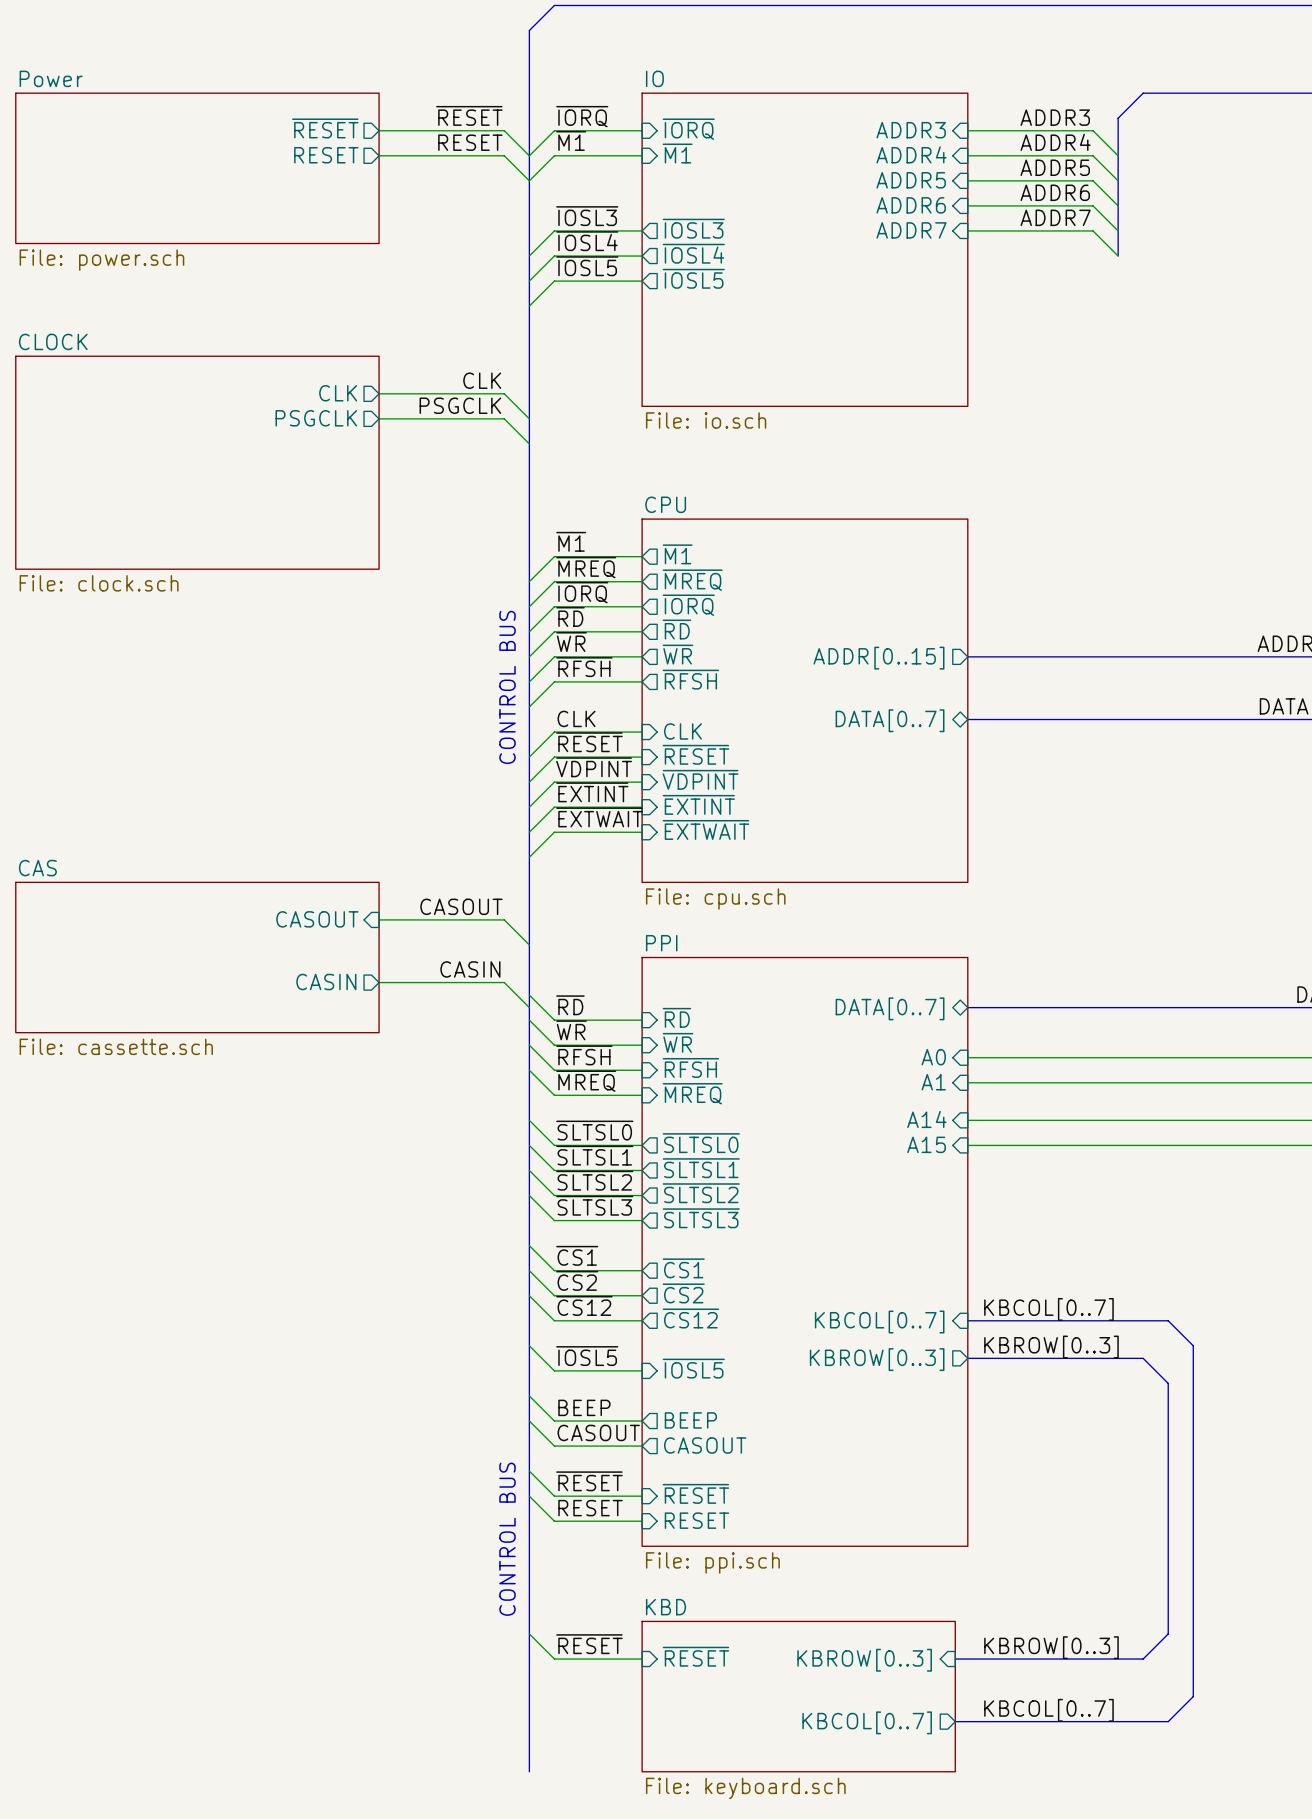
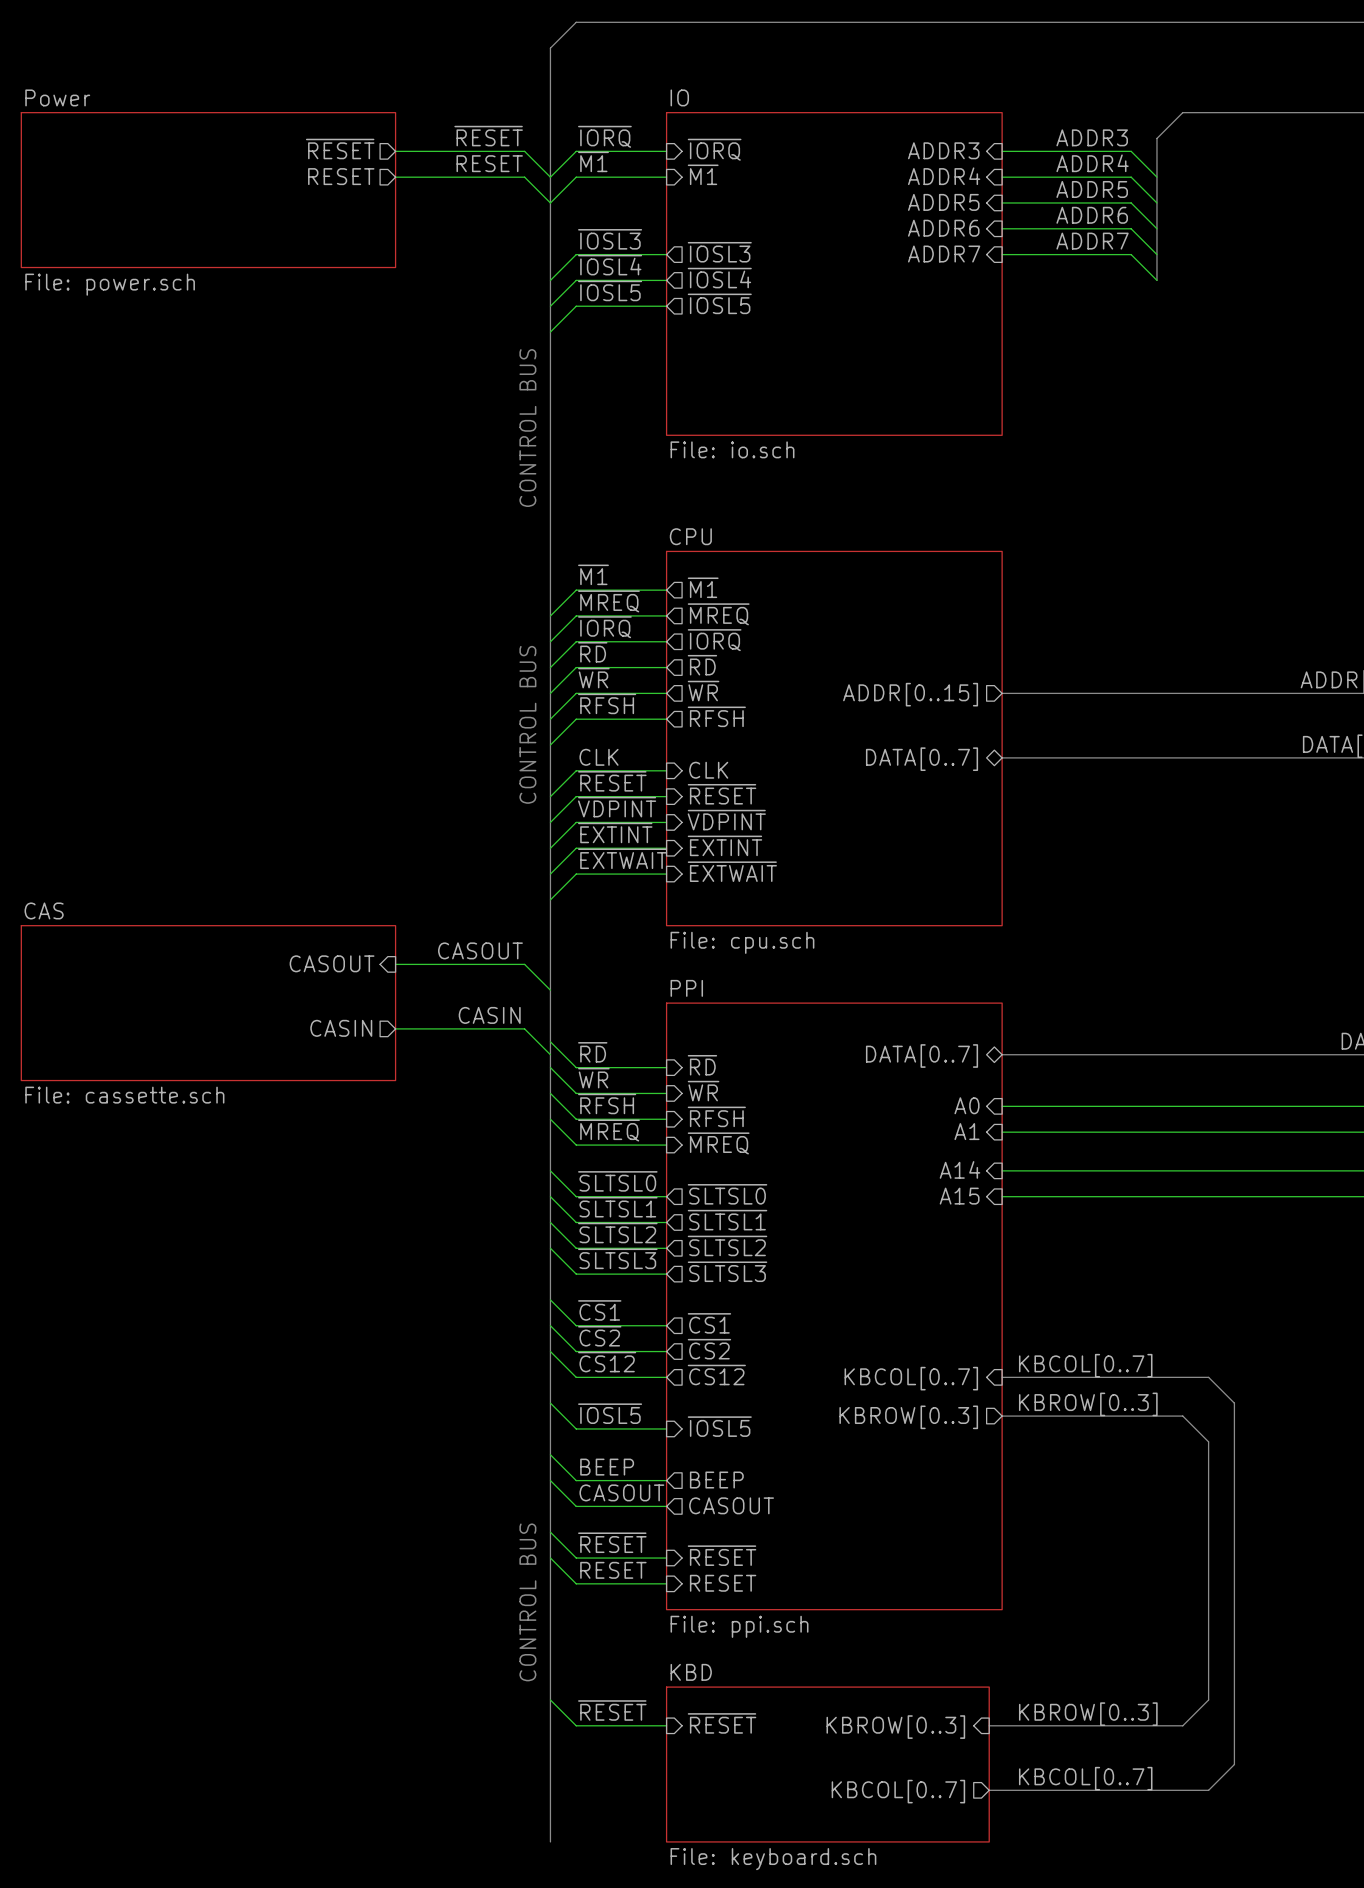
label: CLK (482, 380) -> none
sheet pin: CLK (338, 393) -> none
wire: (379, 393) (504, 393) (529, 418) -> none
text: none -> CONTROL BUS (527, 428)
label: PSGCLK (460, 405) -> none
sheet pin: PSGCLK (316, 418) -> none
wire: (379, 418) (504, 418) (529, 443) -> none
sheet CLOCK: File: clock.sch (197, 462) -> none

